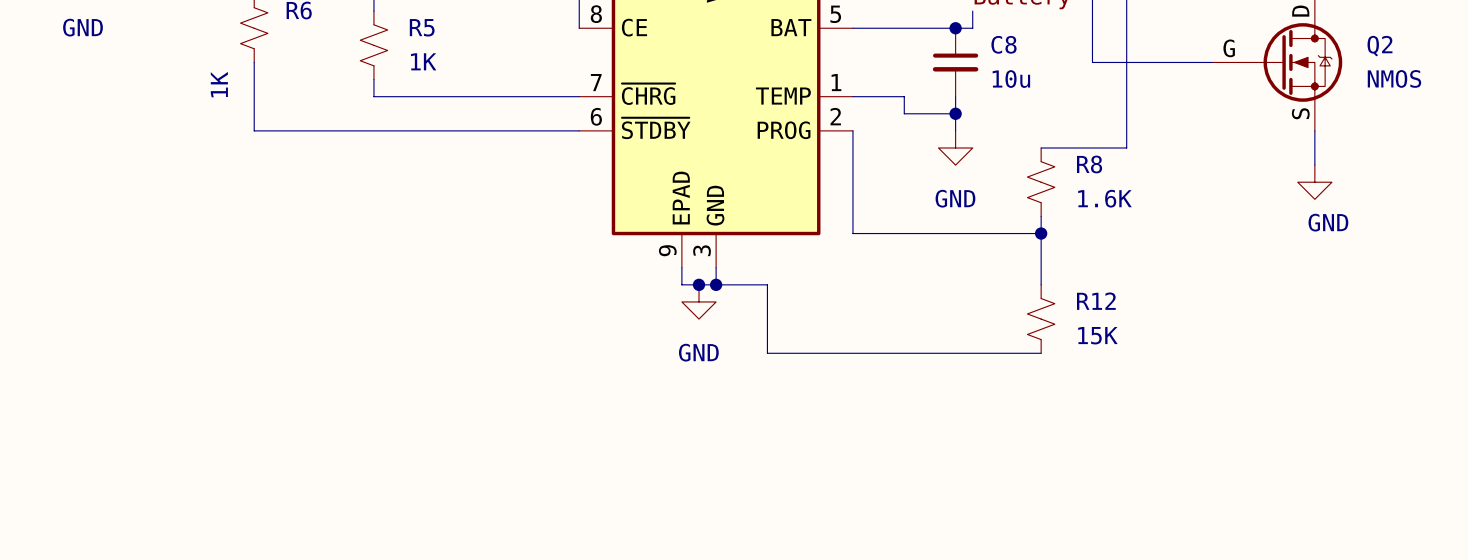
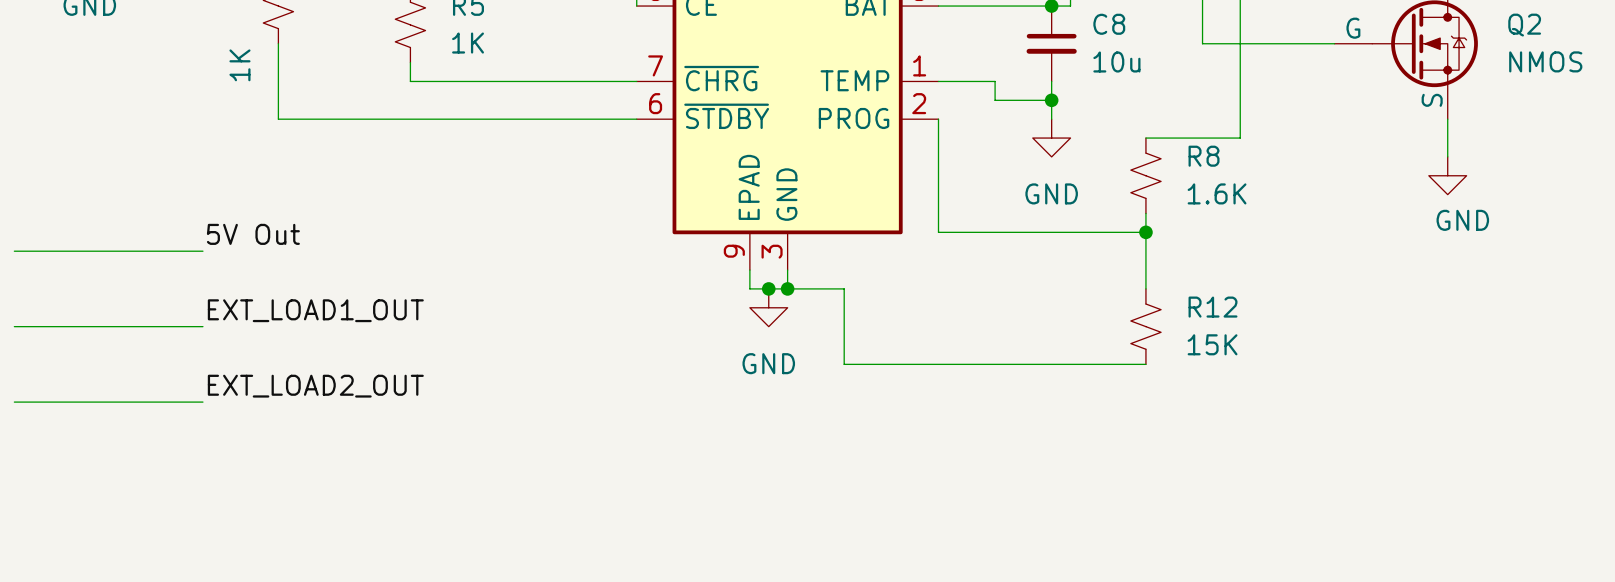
label: none -> 5V Out (253, 234)
wire: none -> (14, 251) (202, 251)
label: none -> EXT_LOAD1_OUT (315, 310)
wire: none -> (14, 326) (202, 326)
label: none -> EXT_LOAD2_OUT (315, 386)
wire: none -> (14, 402) (202, 402)

